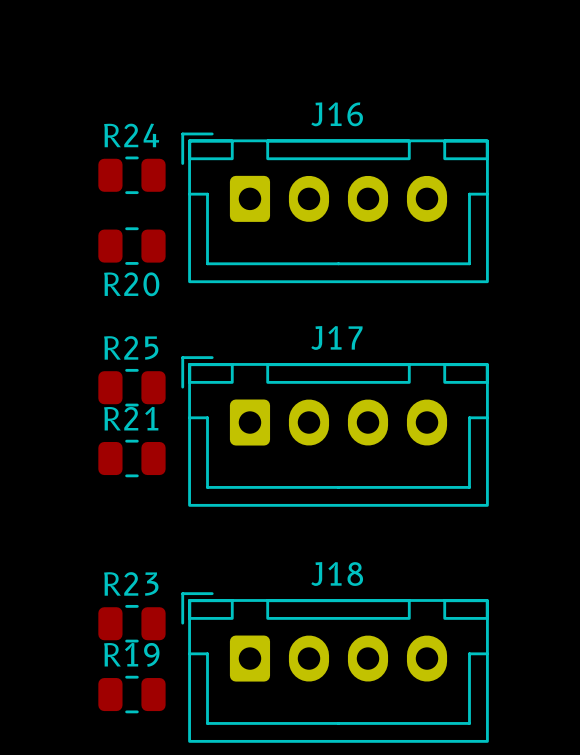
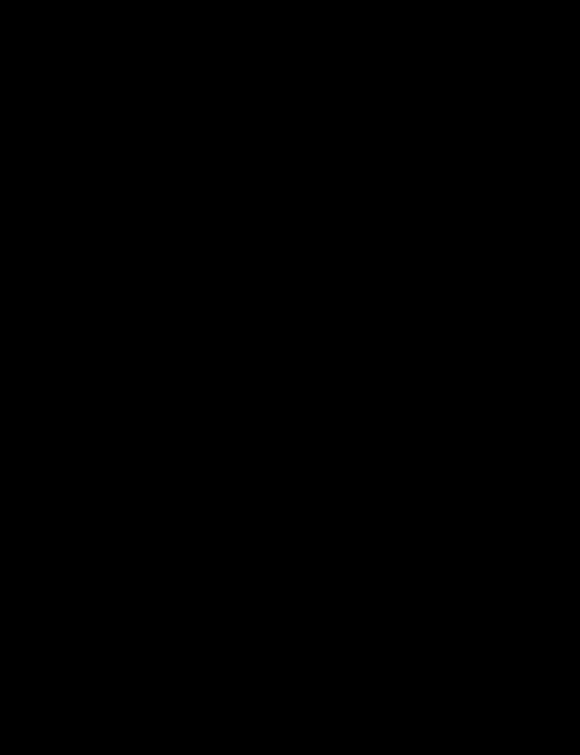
R24: (131, 175) -> none
J16: (335, 207) -> none
R20: (131, 246) -> none
R25: (131, 387) -> none
J17: (335, 431) -> none
R21: (131, 458) -> none
R23: (131, 623) -> none
J18: (335, 667) -> none
R19: (131, 694) -> none

